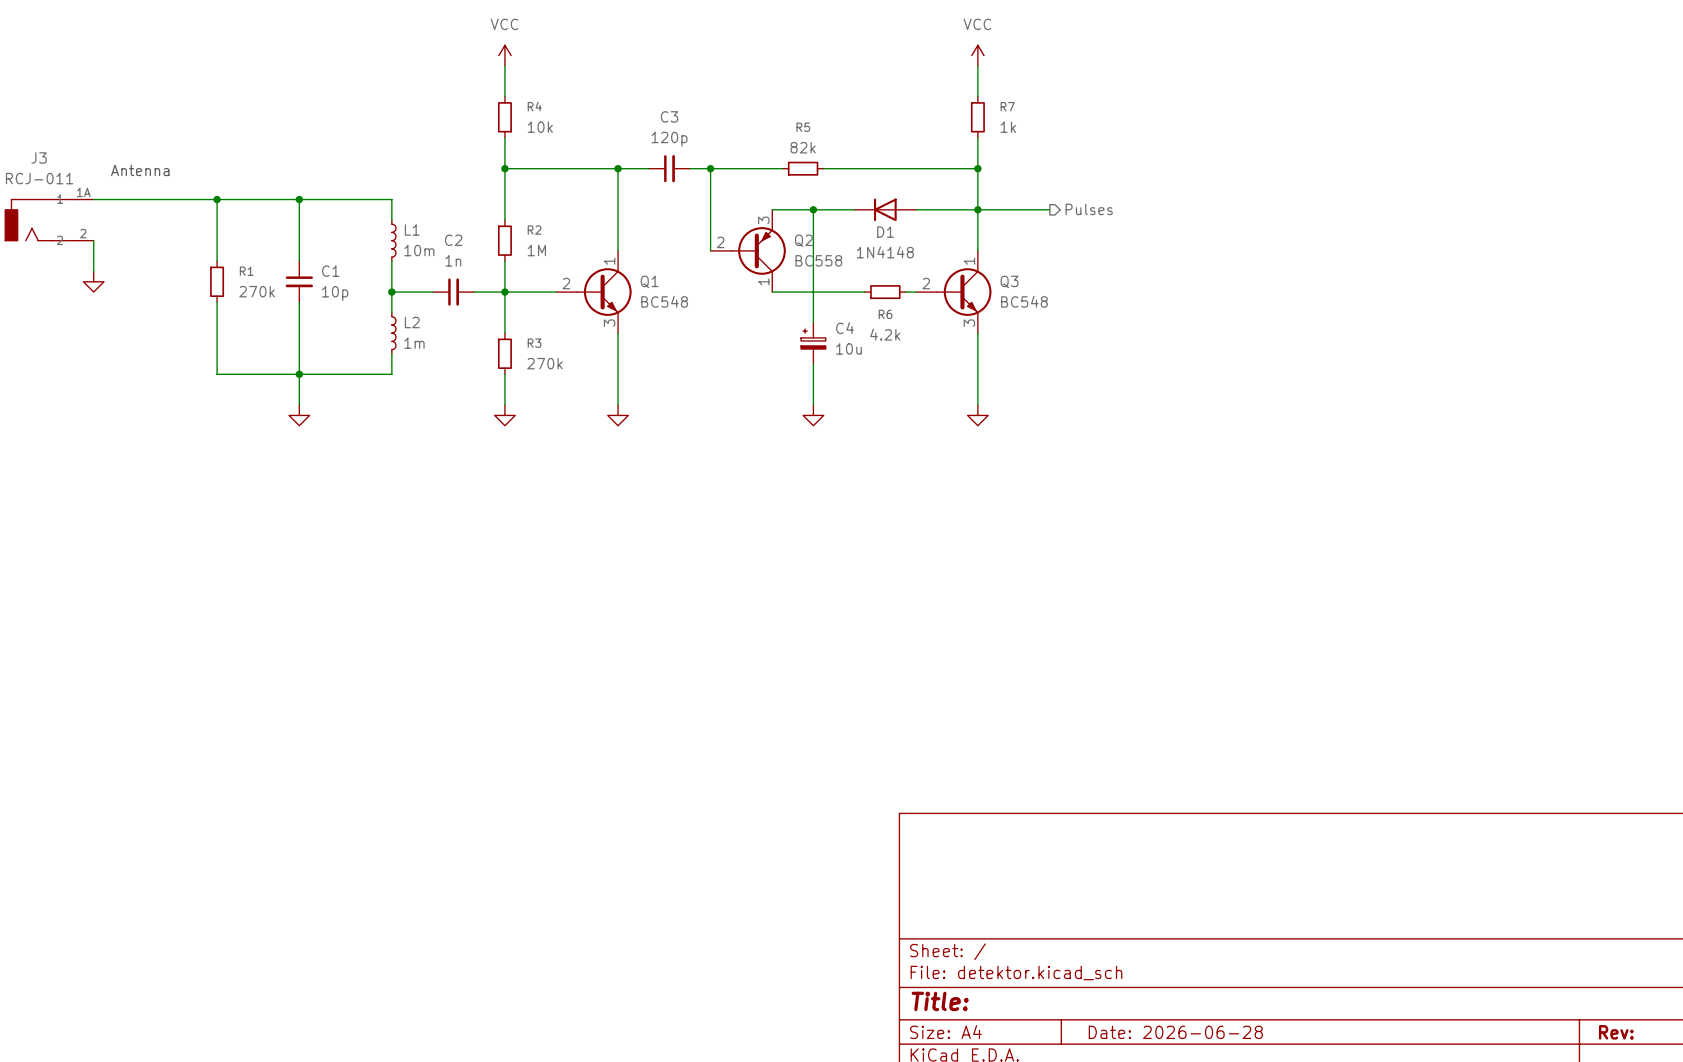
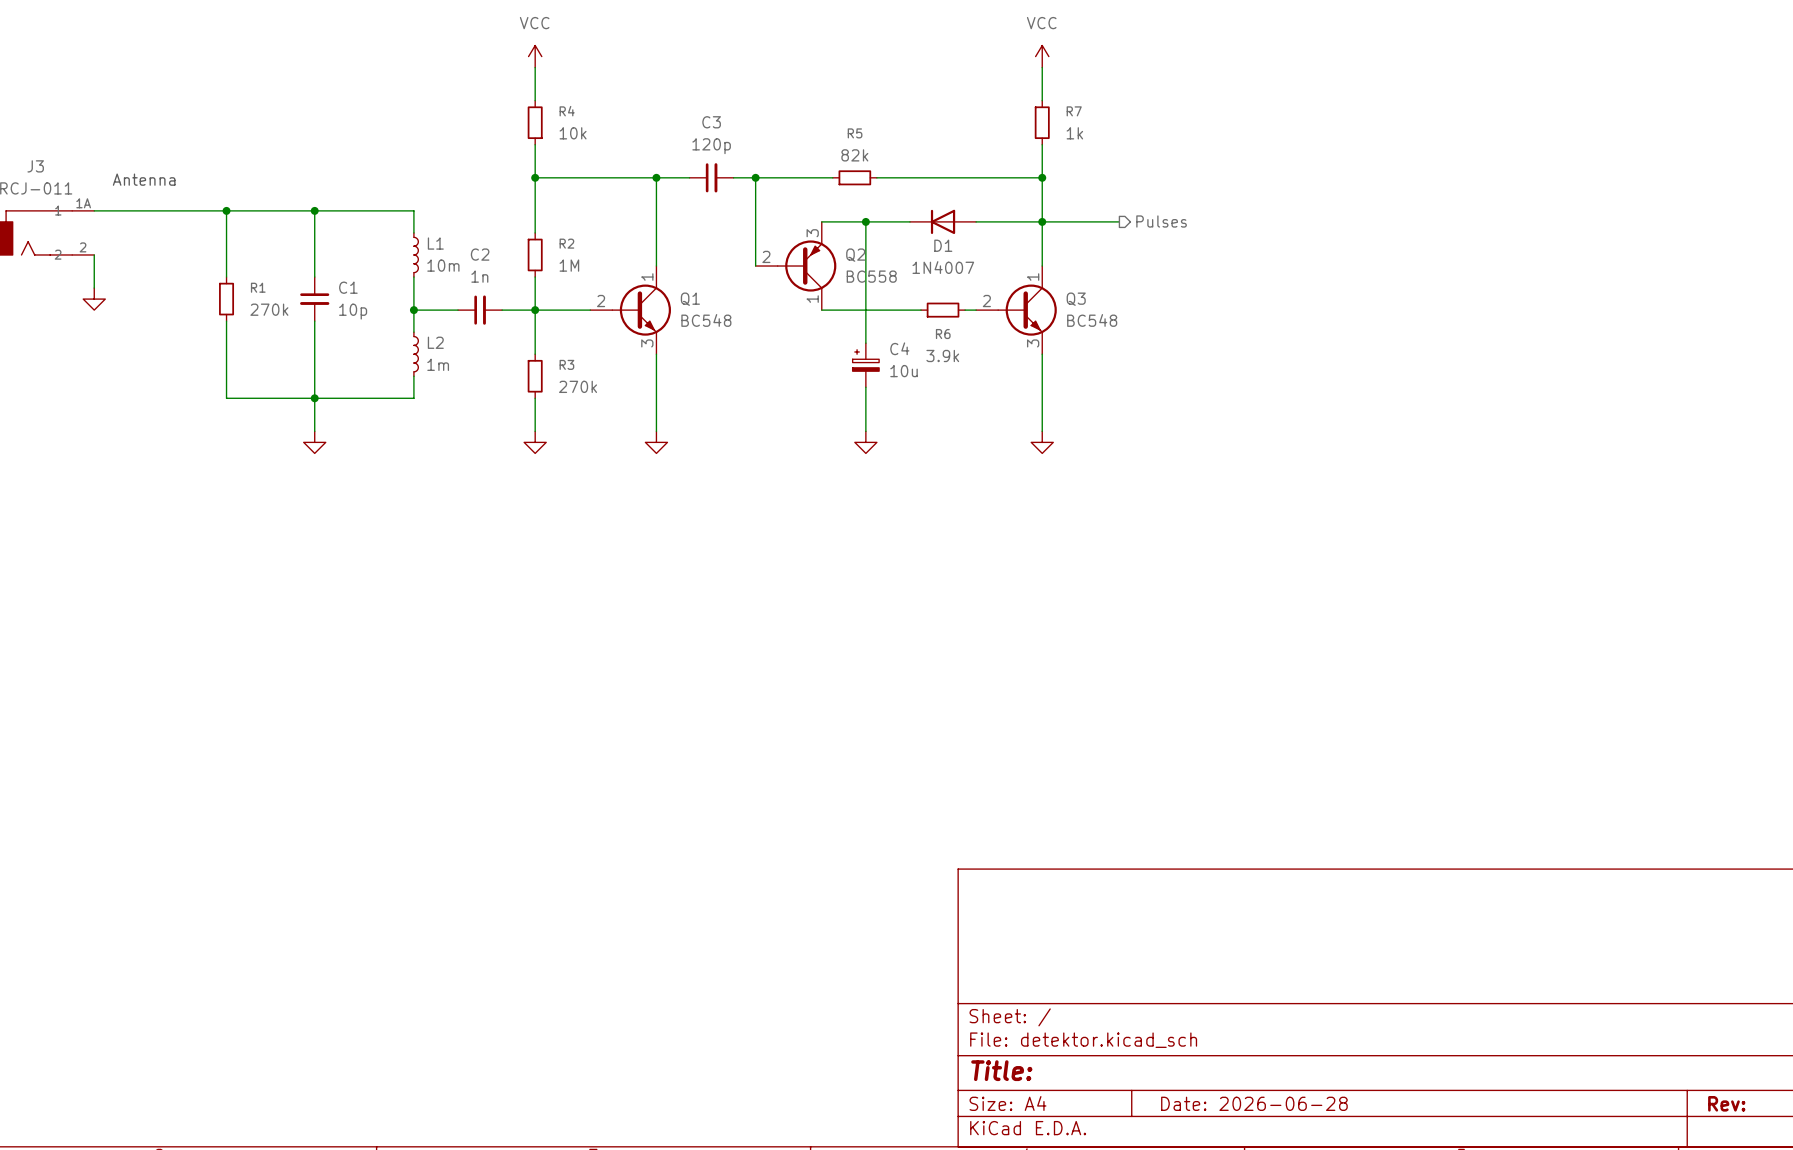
D1 value: 1N4148 (885, 252) -> 1N4007 (943, 267)
R6 value: 4.2k (885, 334) -> 3.9k (942, 355)

